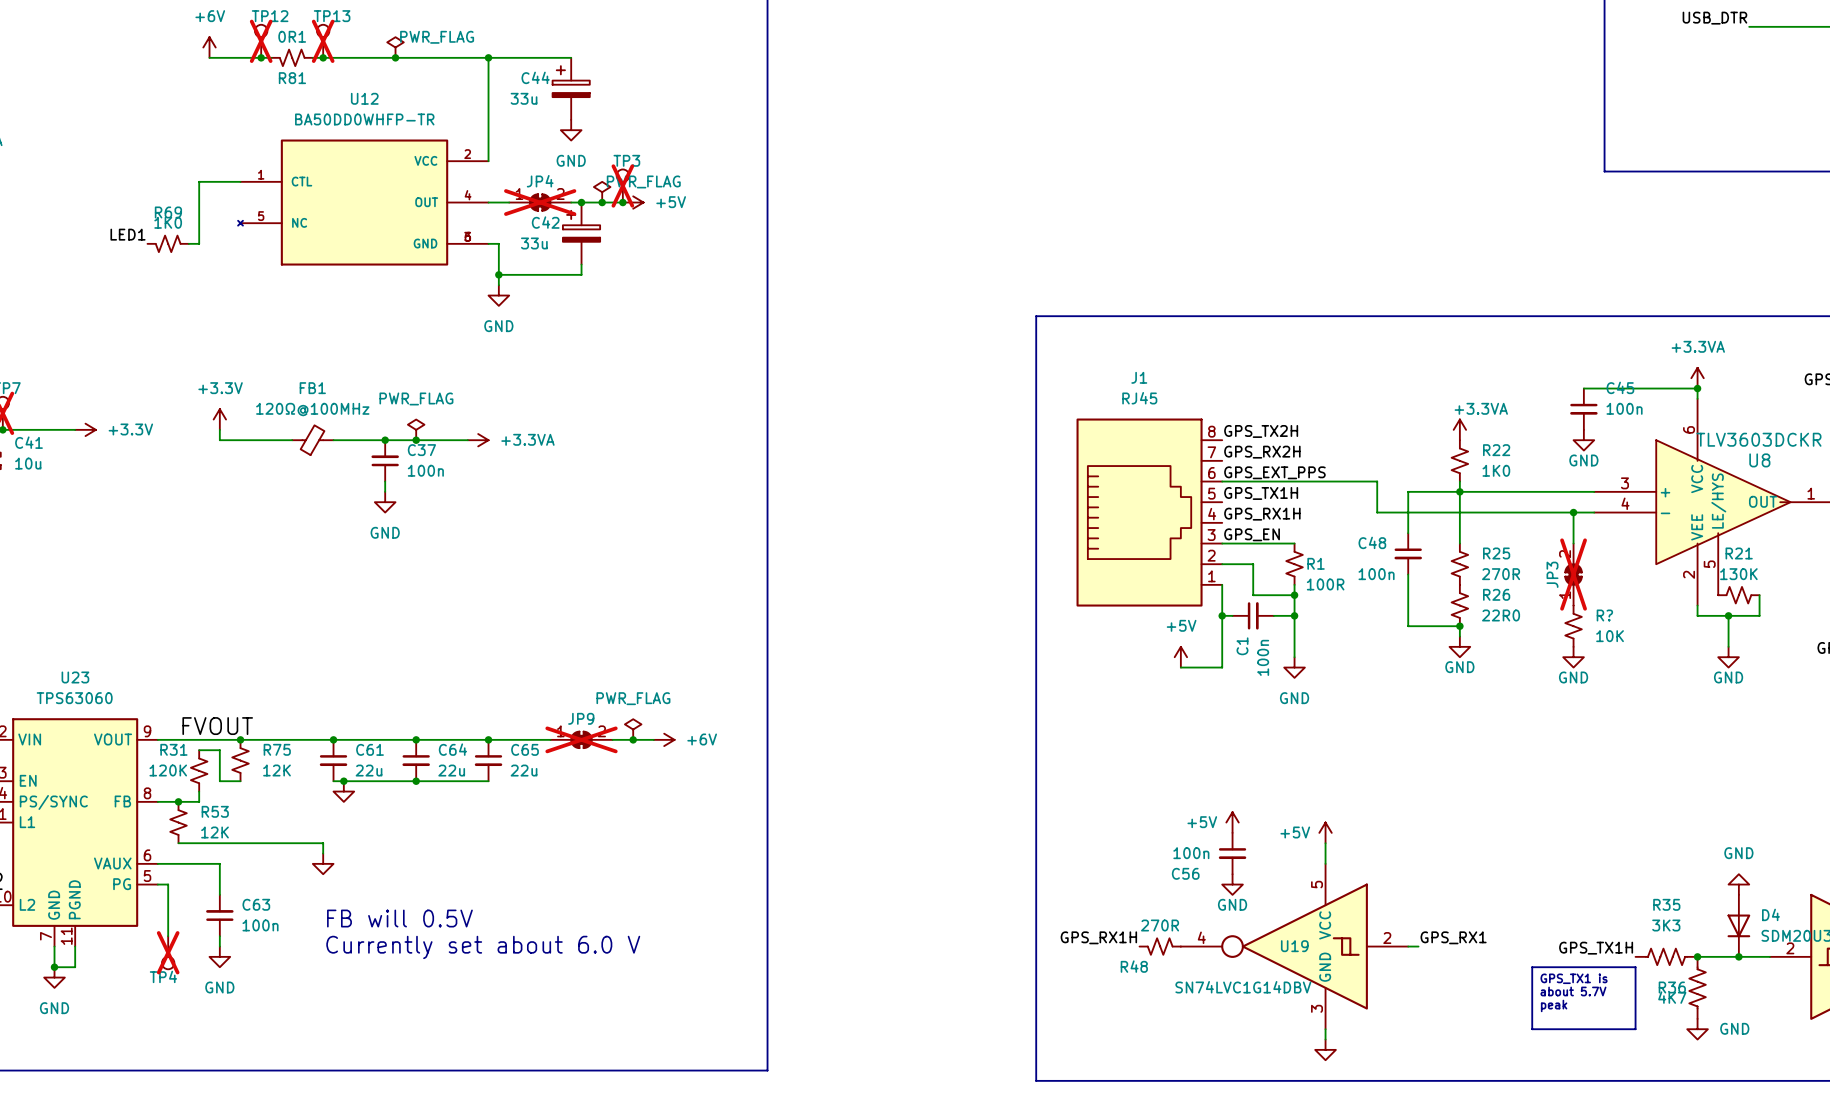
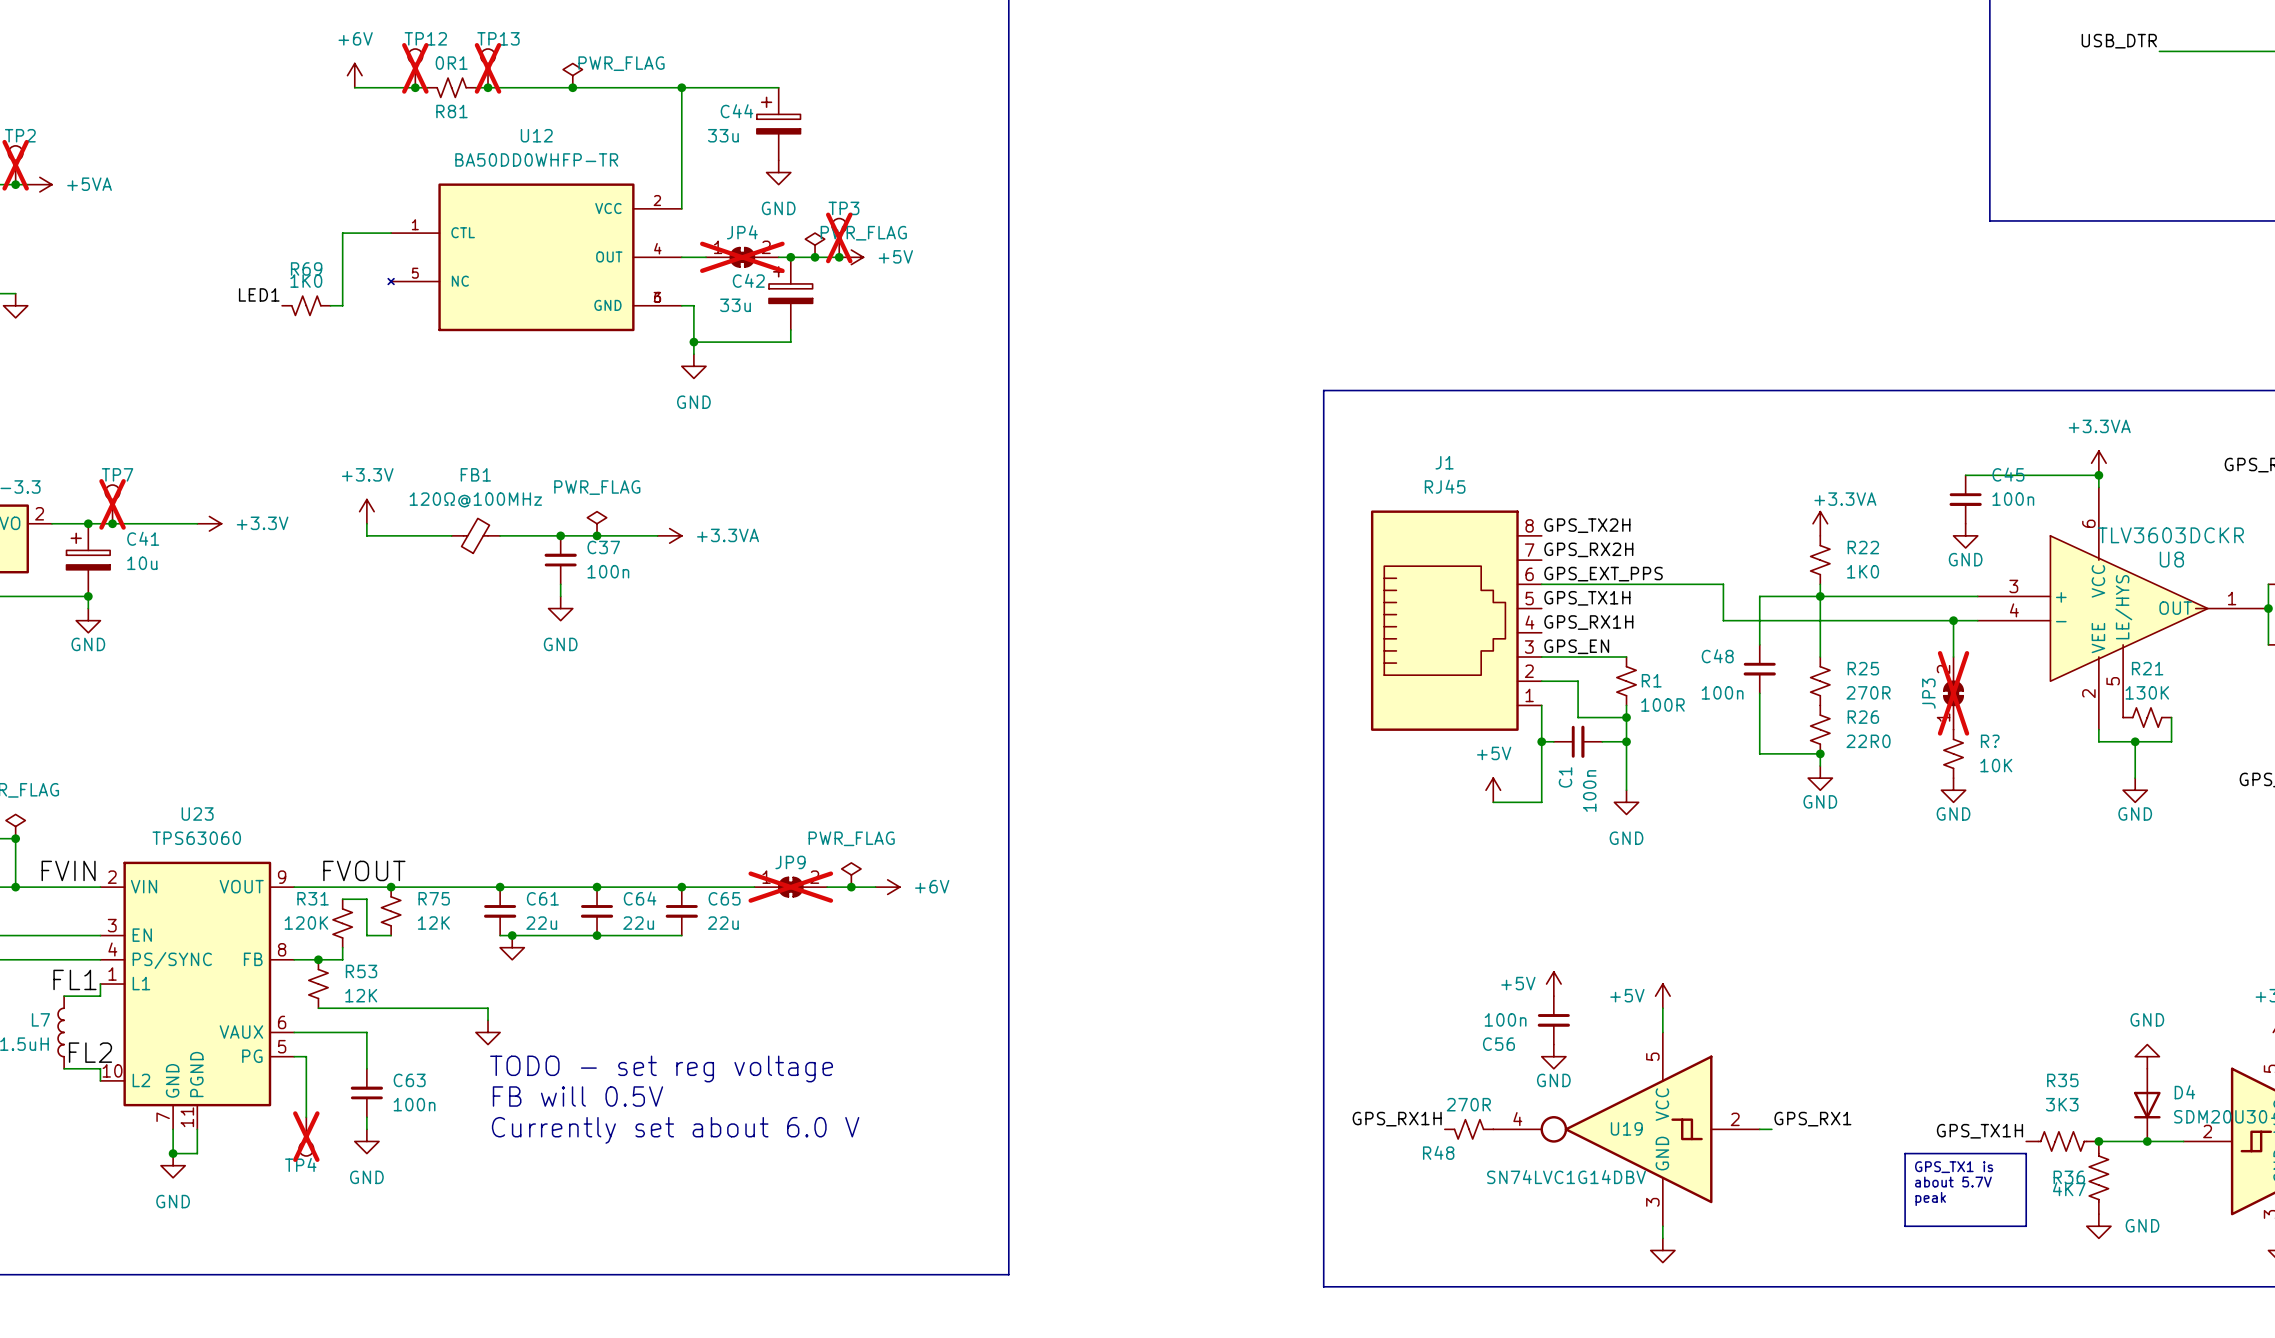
text: none -> TODO - set reg voltage (661, 1068)

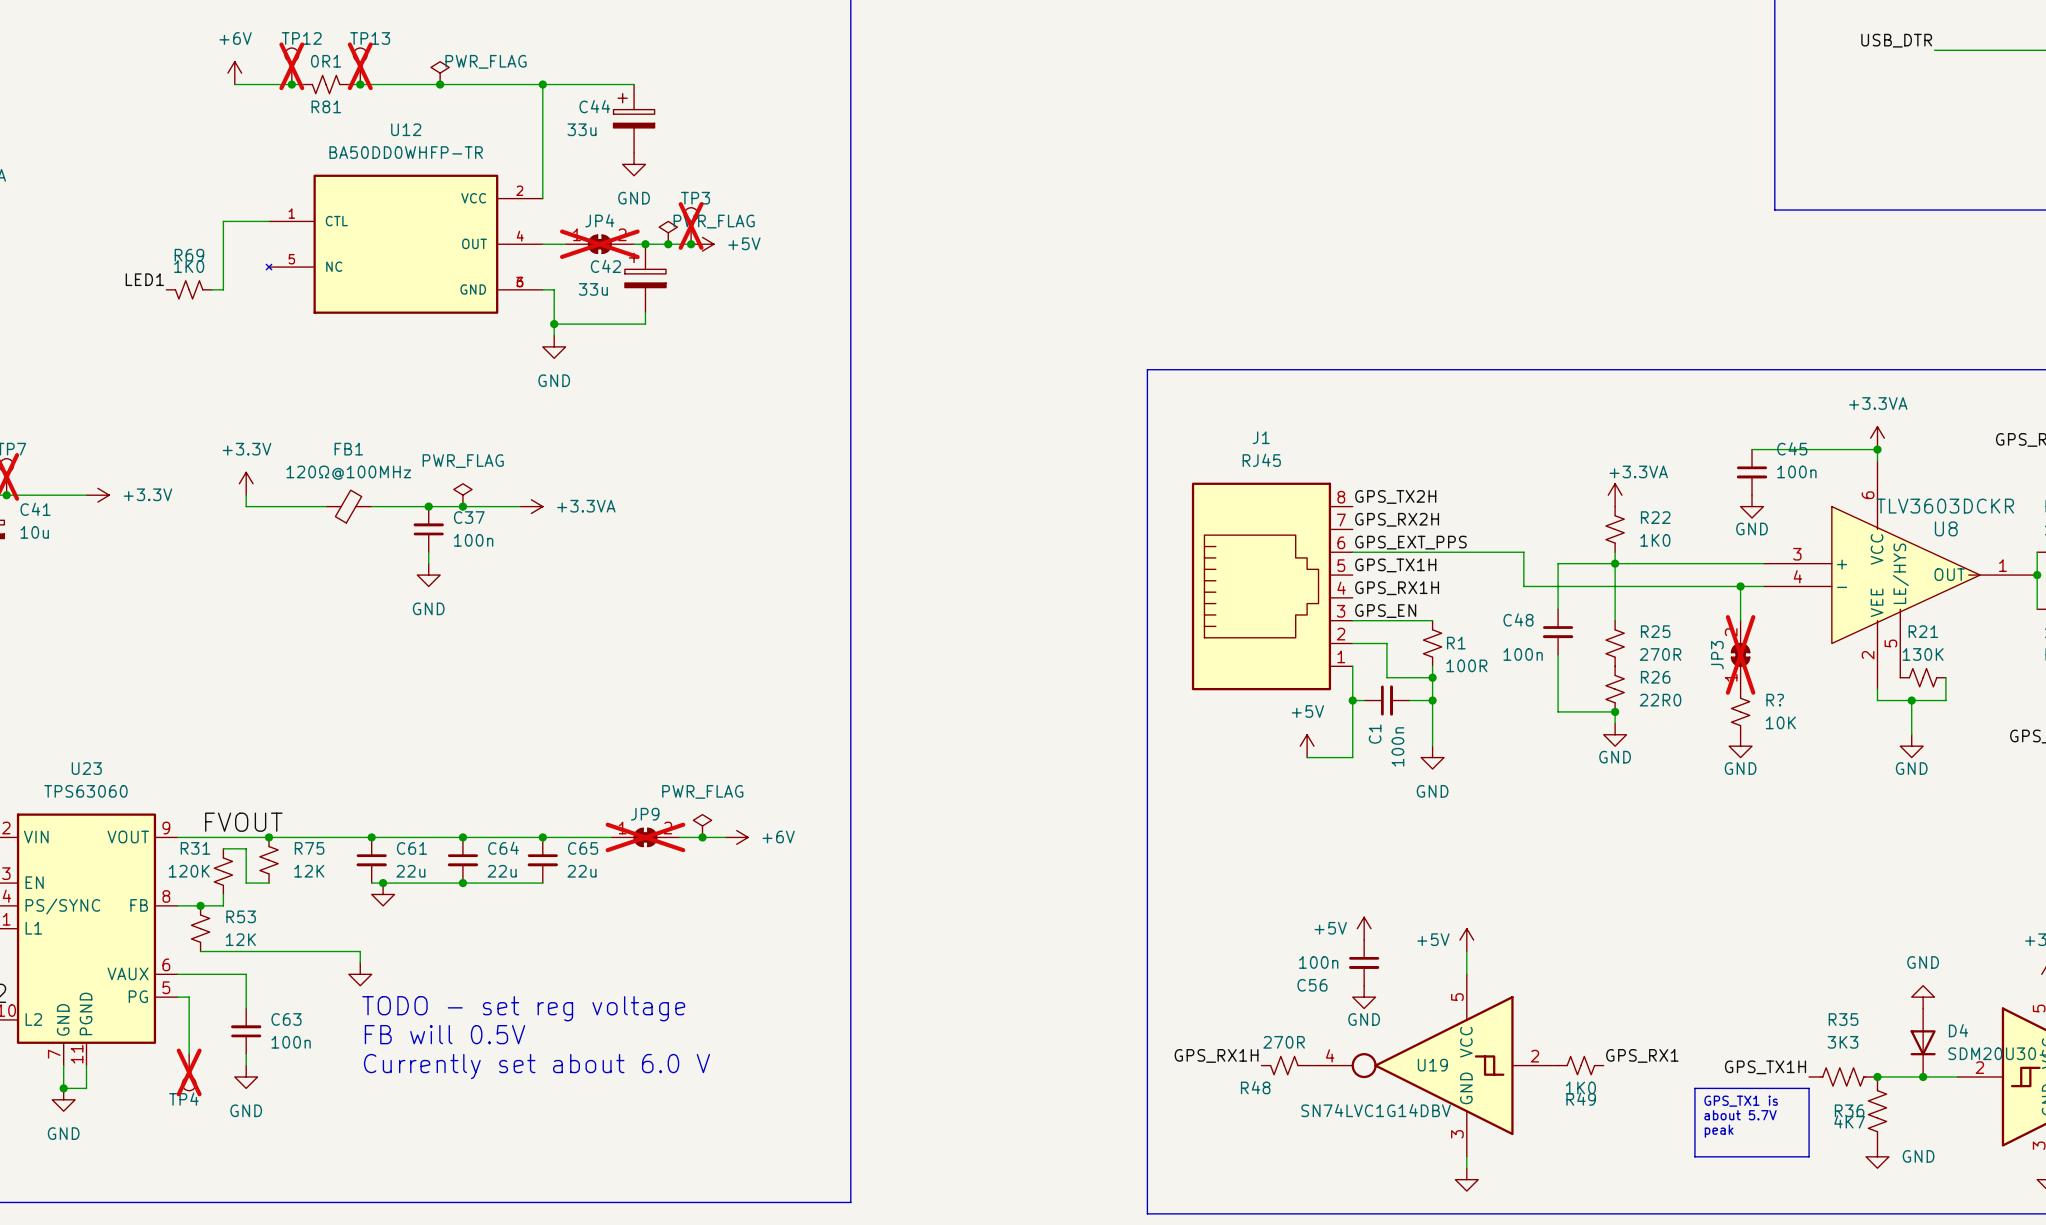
label position: GPS_RX1 (1812, 1119) -> GPS_RX1 (1642, 1055)
R49: none -> 1K0 (1580, 1065)

